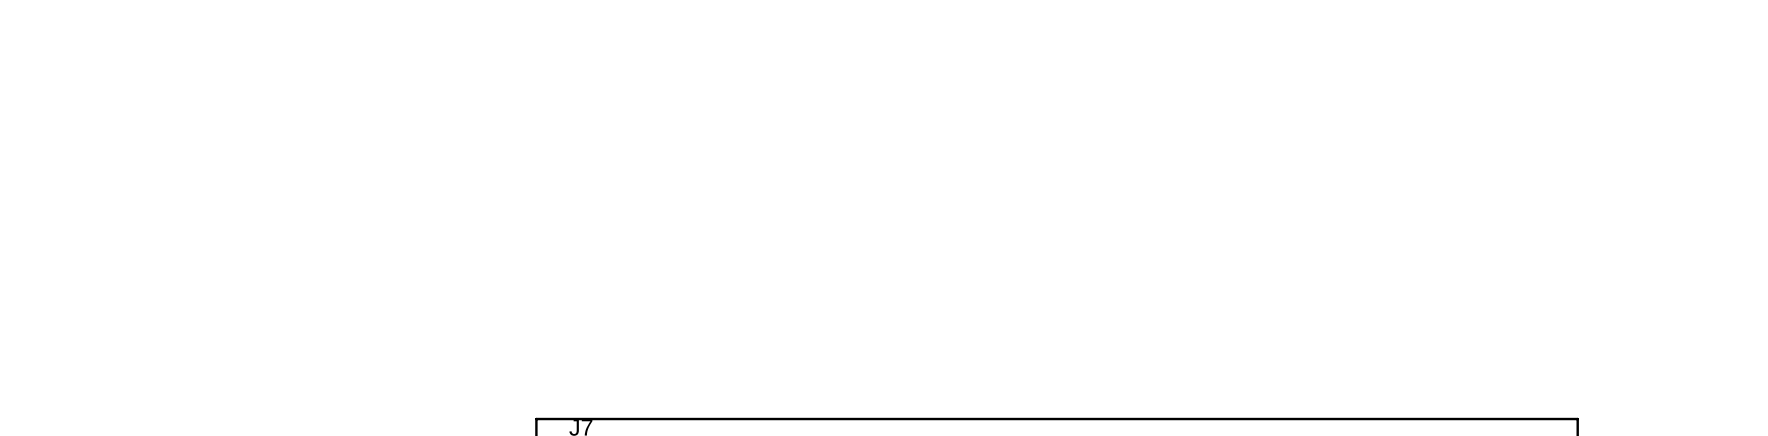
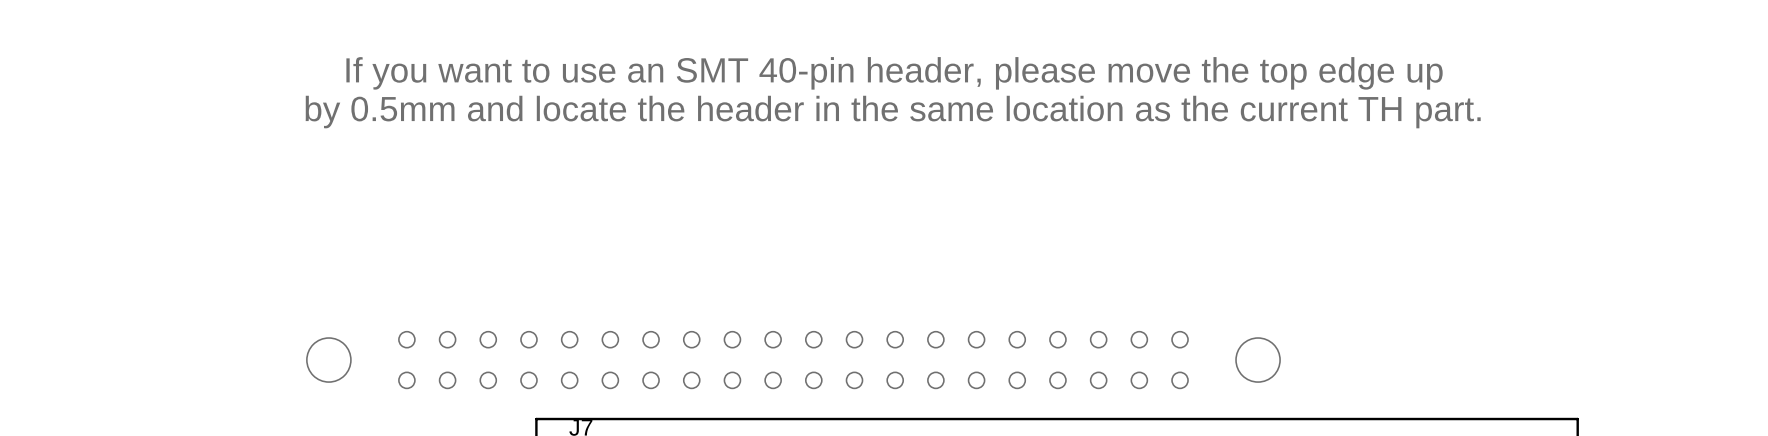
text: none -> If you want to use an SMT 40-pin header, please move the top edge up (894, 73)
text: none -> by 0.5mm and locate the header in the same location as the current TH part. (893, 112)
drawing: none -> [398, 330, 416, 349]
drawing: none -> [438, 330, 457, 349]
drawing: none -> [479, 330, 498, 349]
drawing: none -> [520, 330, 538, 349]
drawing: none -> [560, 330, 579, 349]
drawing: none -> [601, 330, 620, 349]
drawing: none -> [642, 330, 660, 349]
drawing: none -> [682, 330, 701, 349]
drawing: none -> [723, 330, 742, 349]
drawing: none -> [764, 330, 782, 349]
drawing: none -> [805, 330, 823, 349]
drawing: none -> [845, 330, 864, 349]
drawing: none -> [886, 330, 905, 349]
drawing: none -> [927, 330, 945, 349]
drawing: none -> [967, 330, 986, 349]
drawing: none -> [1008, 330, 1027, 349]
drawing: none -> [1049, 330, 1067, 349]
drawing: none -> [1089, 330, 1108, 349]
drawing: none -> [1130, 330, 1149, 349]
drawing: none -> [1171, 330, 1189, 349]
drawing: none -> [306, 337, 352, 383]
drawing: none -> [1235, 337, 1281, 383]
drawing: none -> [398, 371, 416, 390]
drawing: none -> [438, 371, 457, 390]
drawing: none -> [479, 371, 498, 390]
drawing: none -> [520, 371, 538, 390]
drawing: none -> [560, 371, 579, 390]
drawing: none -> [601, 371, 620, 390]
drawing: none -> [642, 371, 660, 390]
drawing: none -> [682, 371, 701, 390]
drawing: none -> [723, 371, 742, 390]
drawing: none -> [764, 371, 782, 390]
drawing: none -> [805, 371, 823, 390]
drawing: none -> [845, 371, 864, 390]
drawing: none -> [886, 371, 905, 390]
drawing: none -> [927, 371, 945, 390]
drawing: none -> [967, 371, 986, 390]
drawing: none -> [1008, 371, 1027, 390]
drawing: none -> [1049, 371, 1067, 390]
drawing: none -> [1089, 371, 1108, 390]
drawing: none -> [1130, 371, 1149, 390]
drawing: none -> [1171, 371, 1189, 390]

